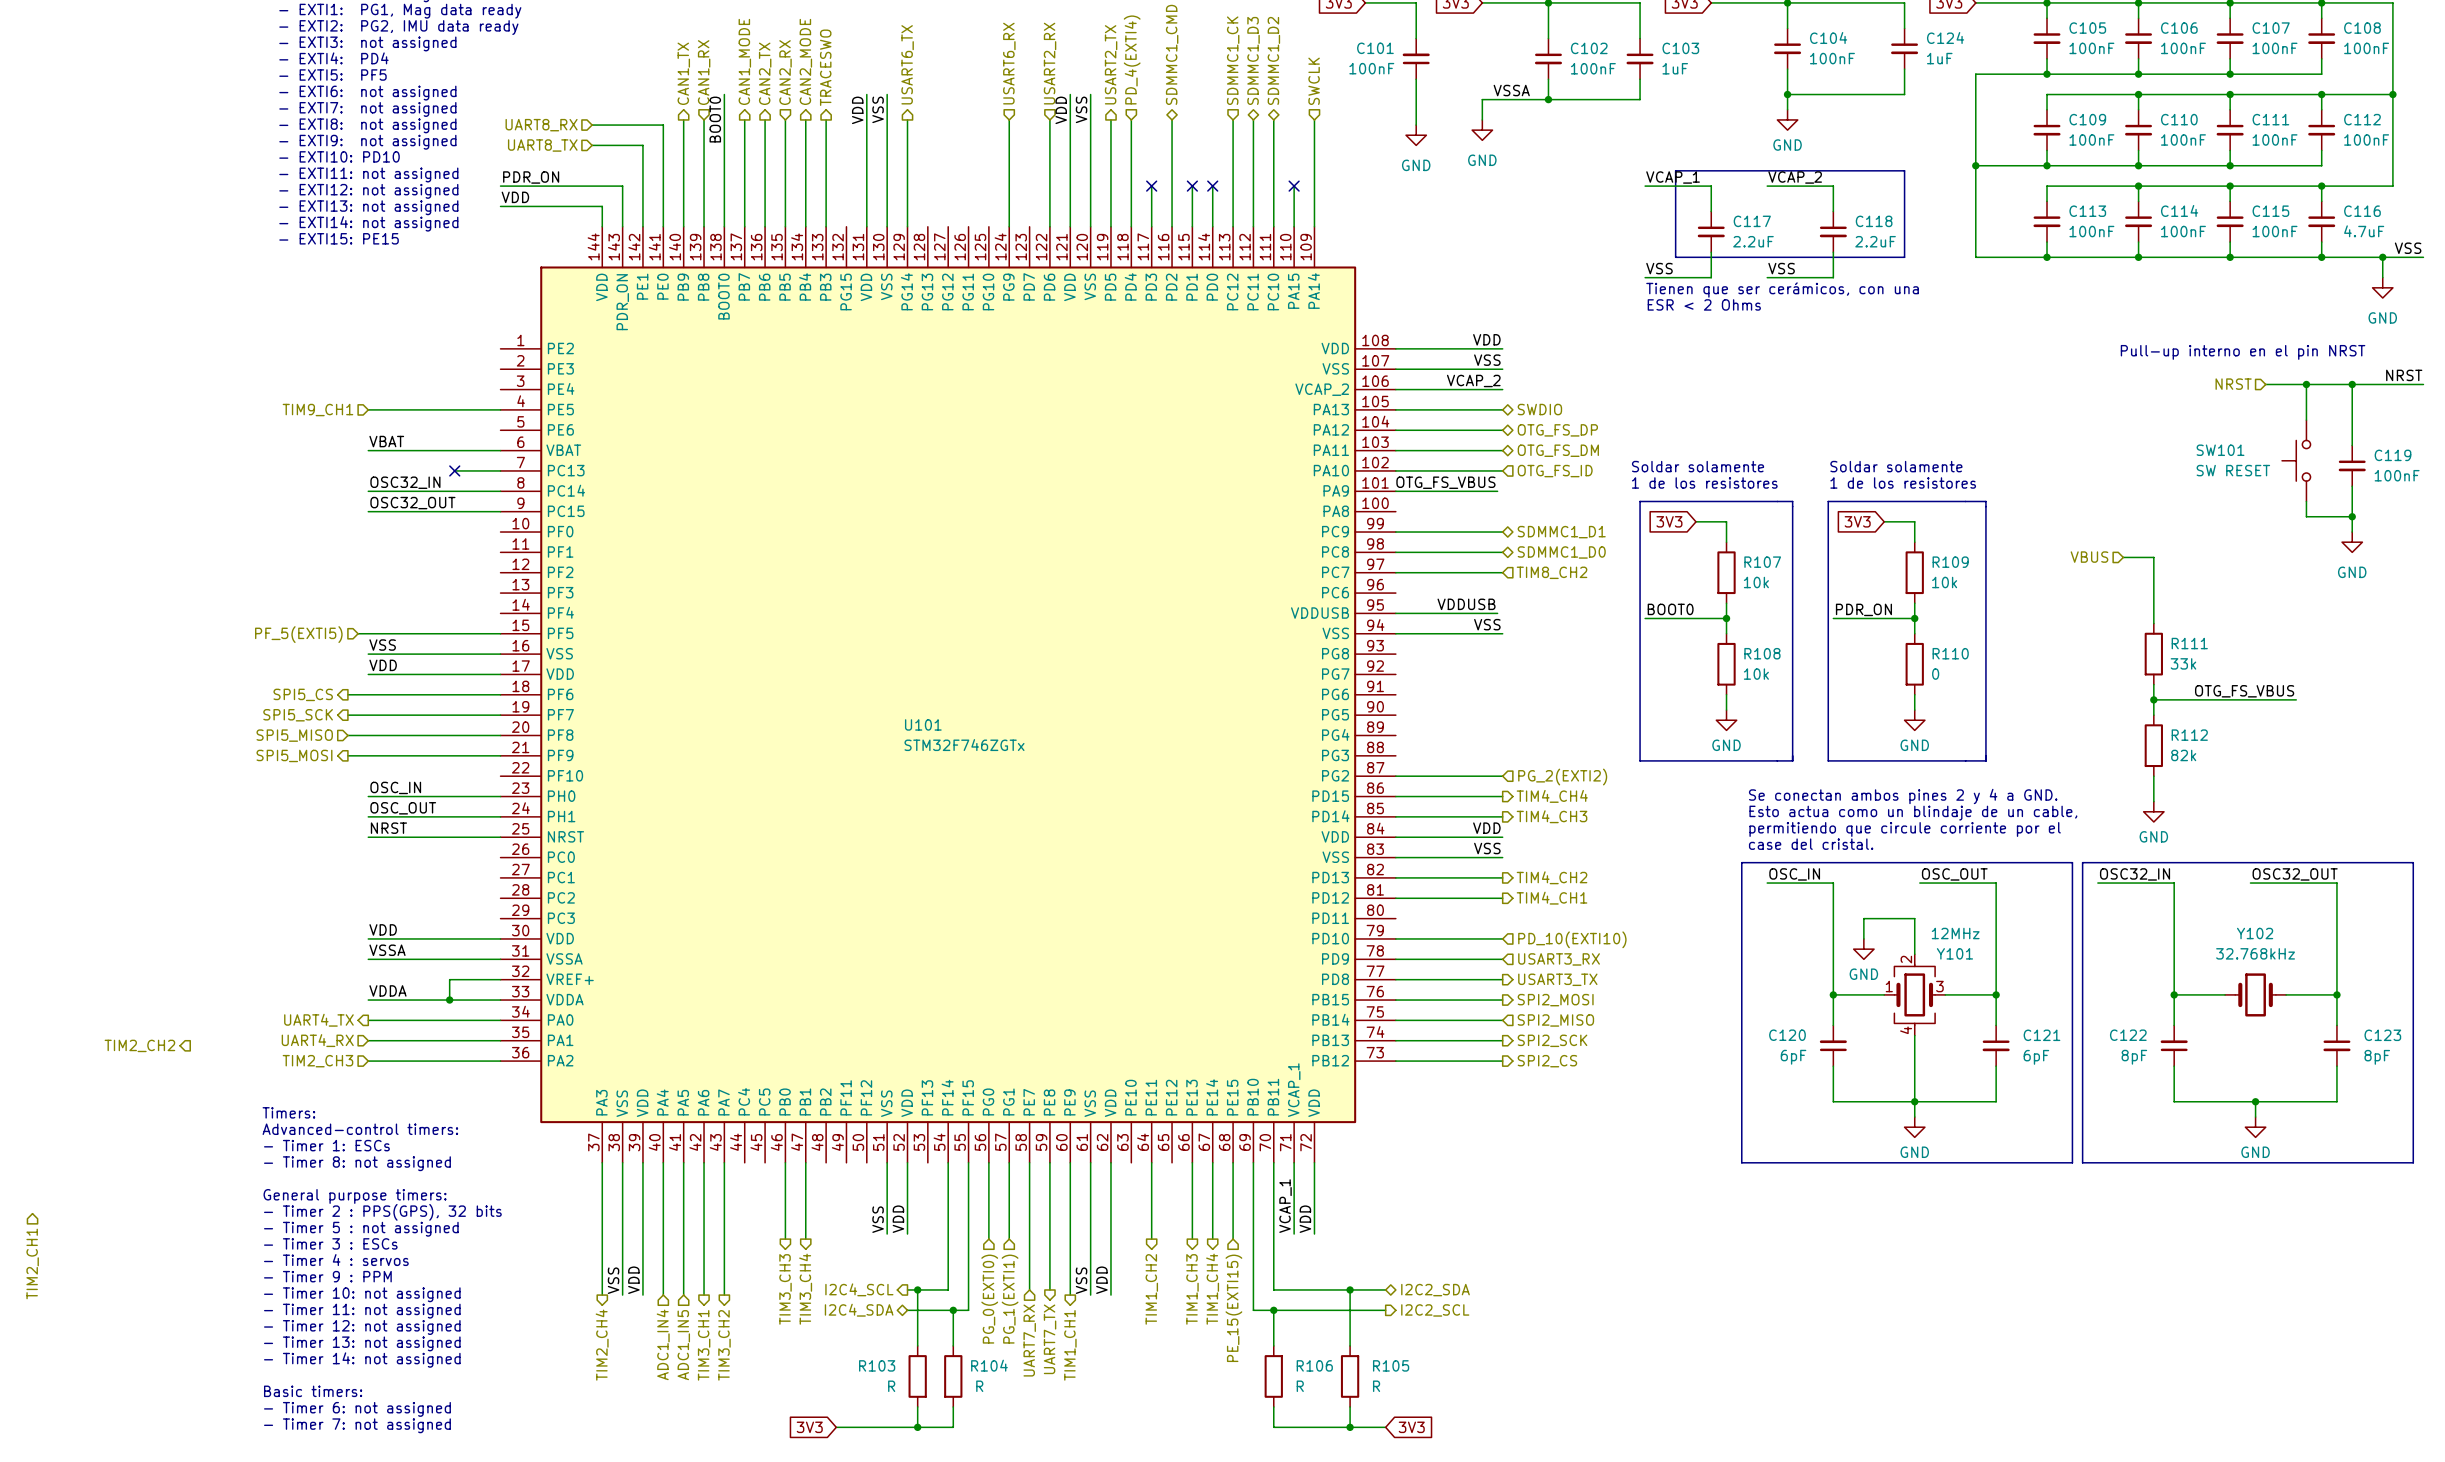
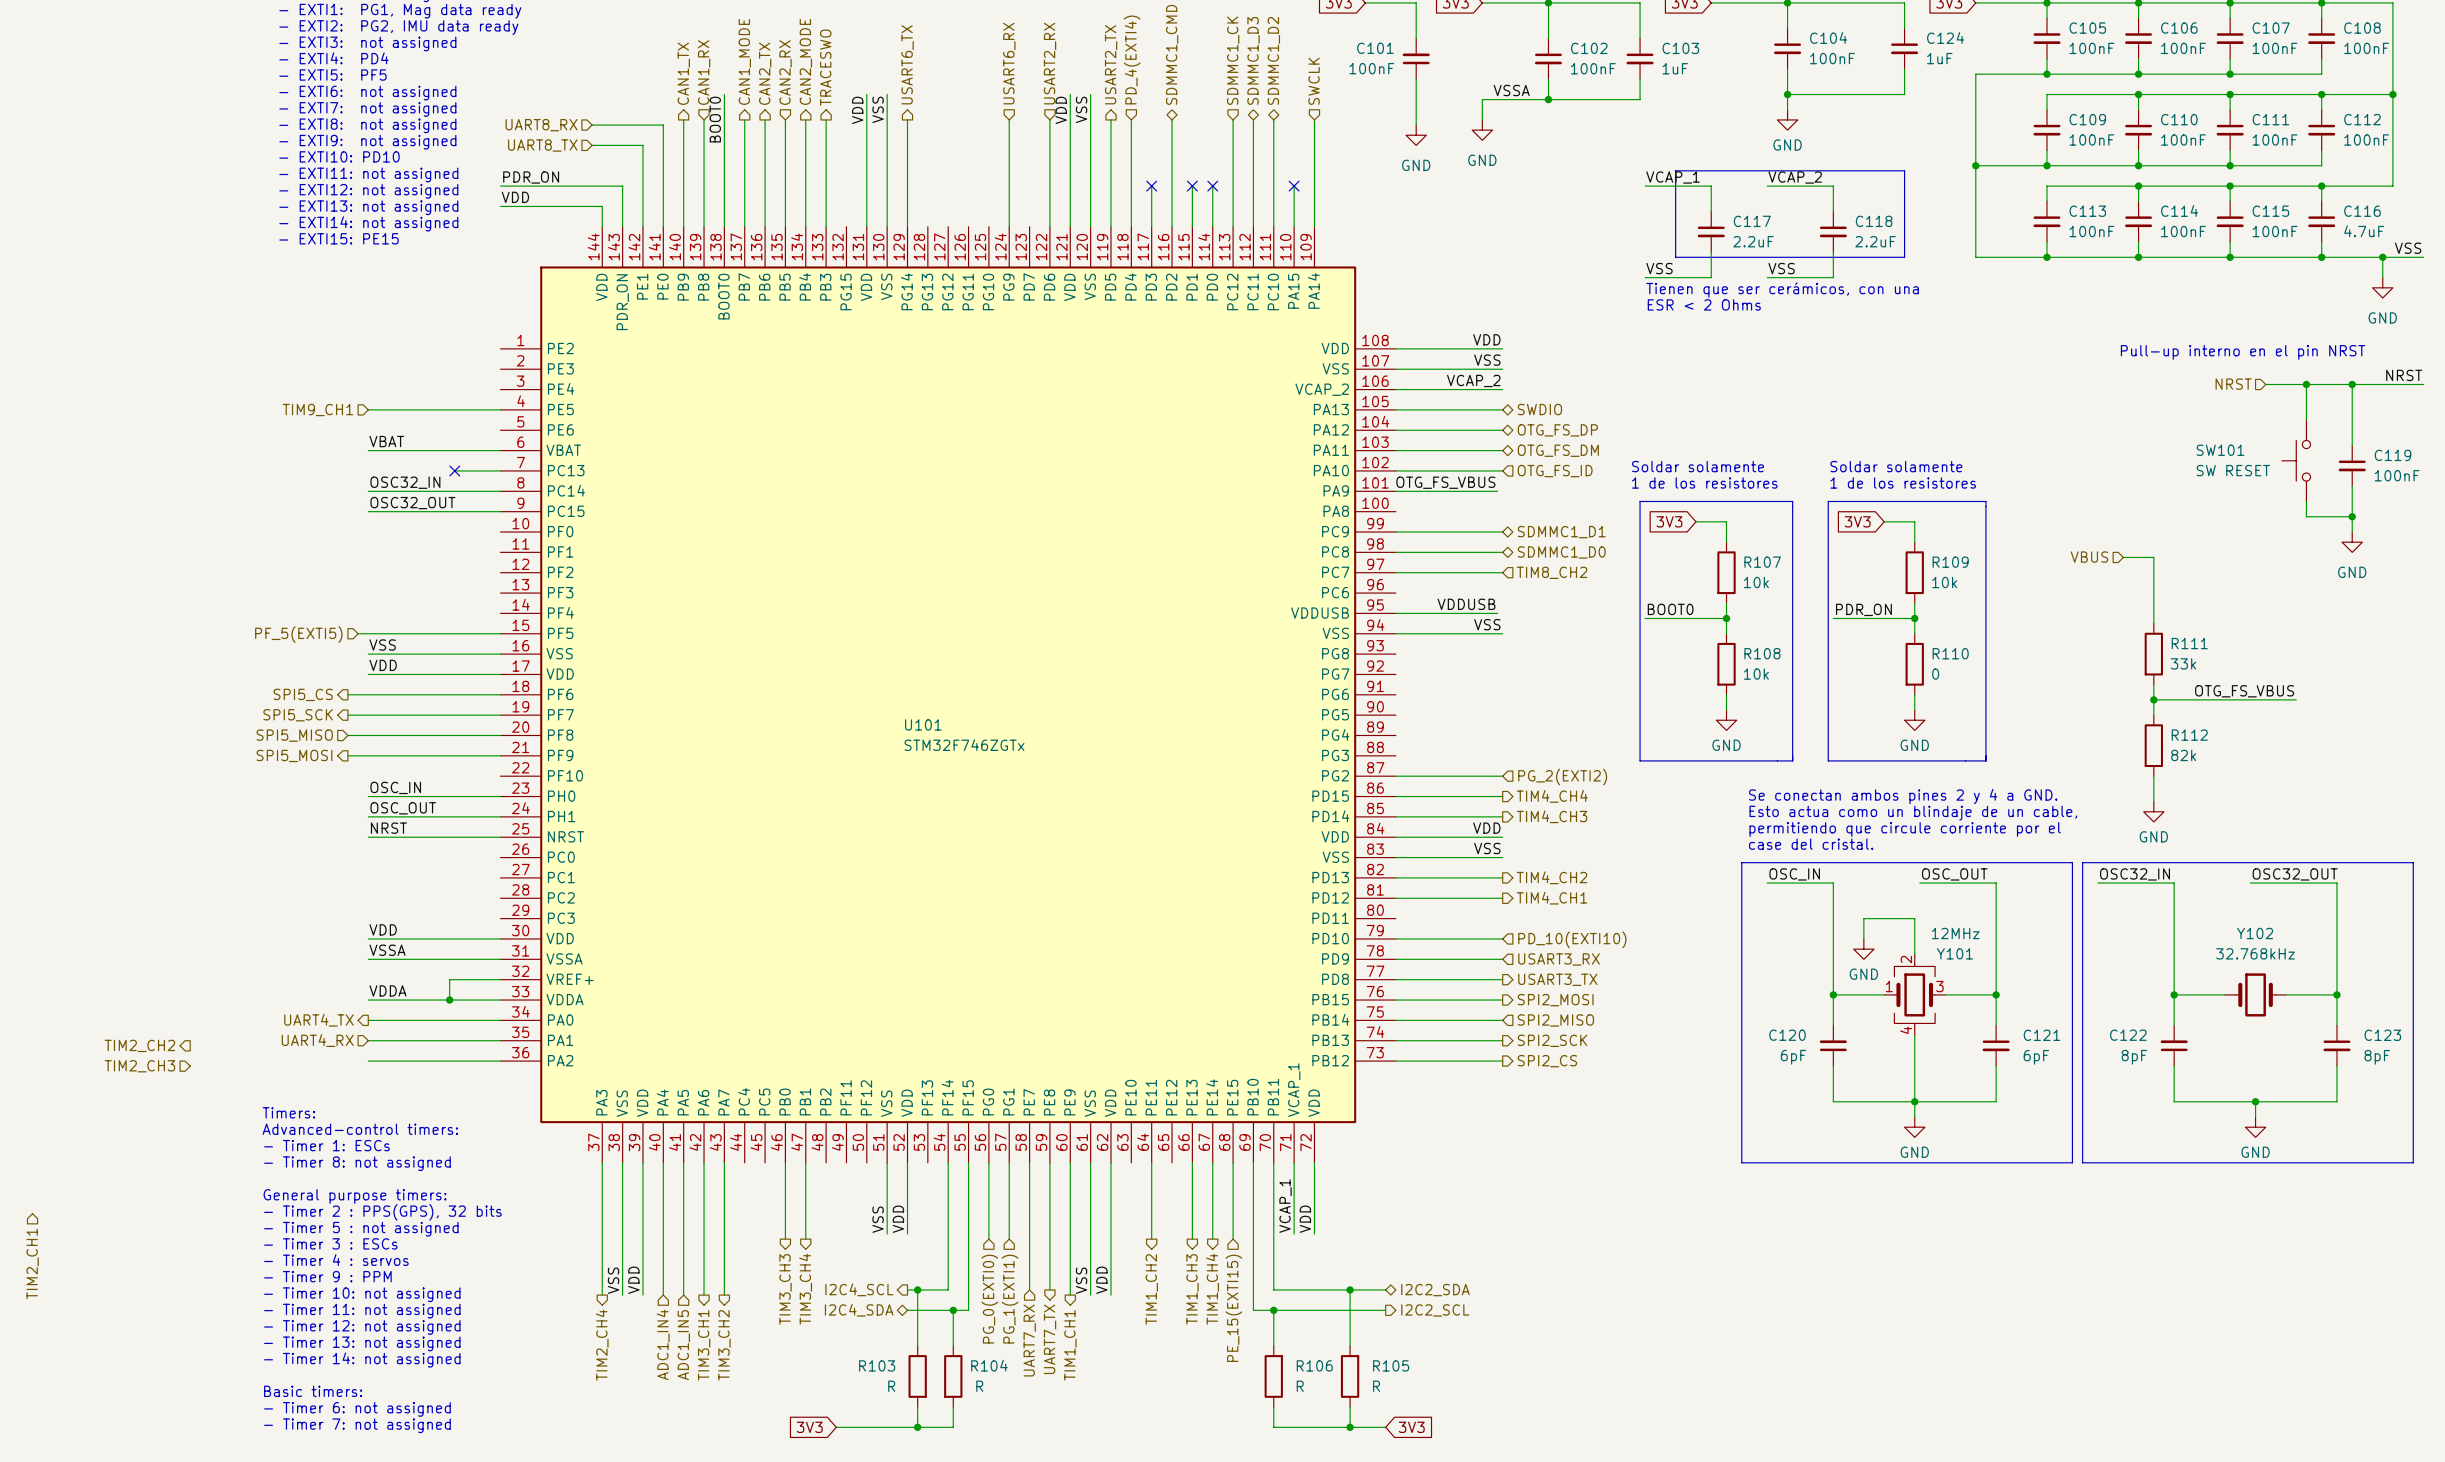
hierarchical label position: TIM2_CH3 (317, 1061) -> TIM2_CH3 (139, 1066)

